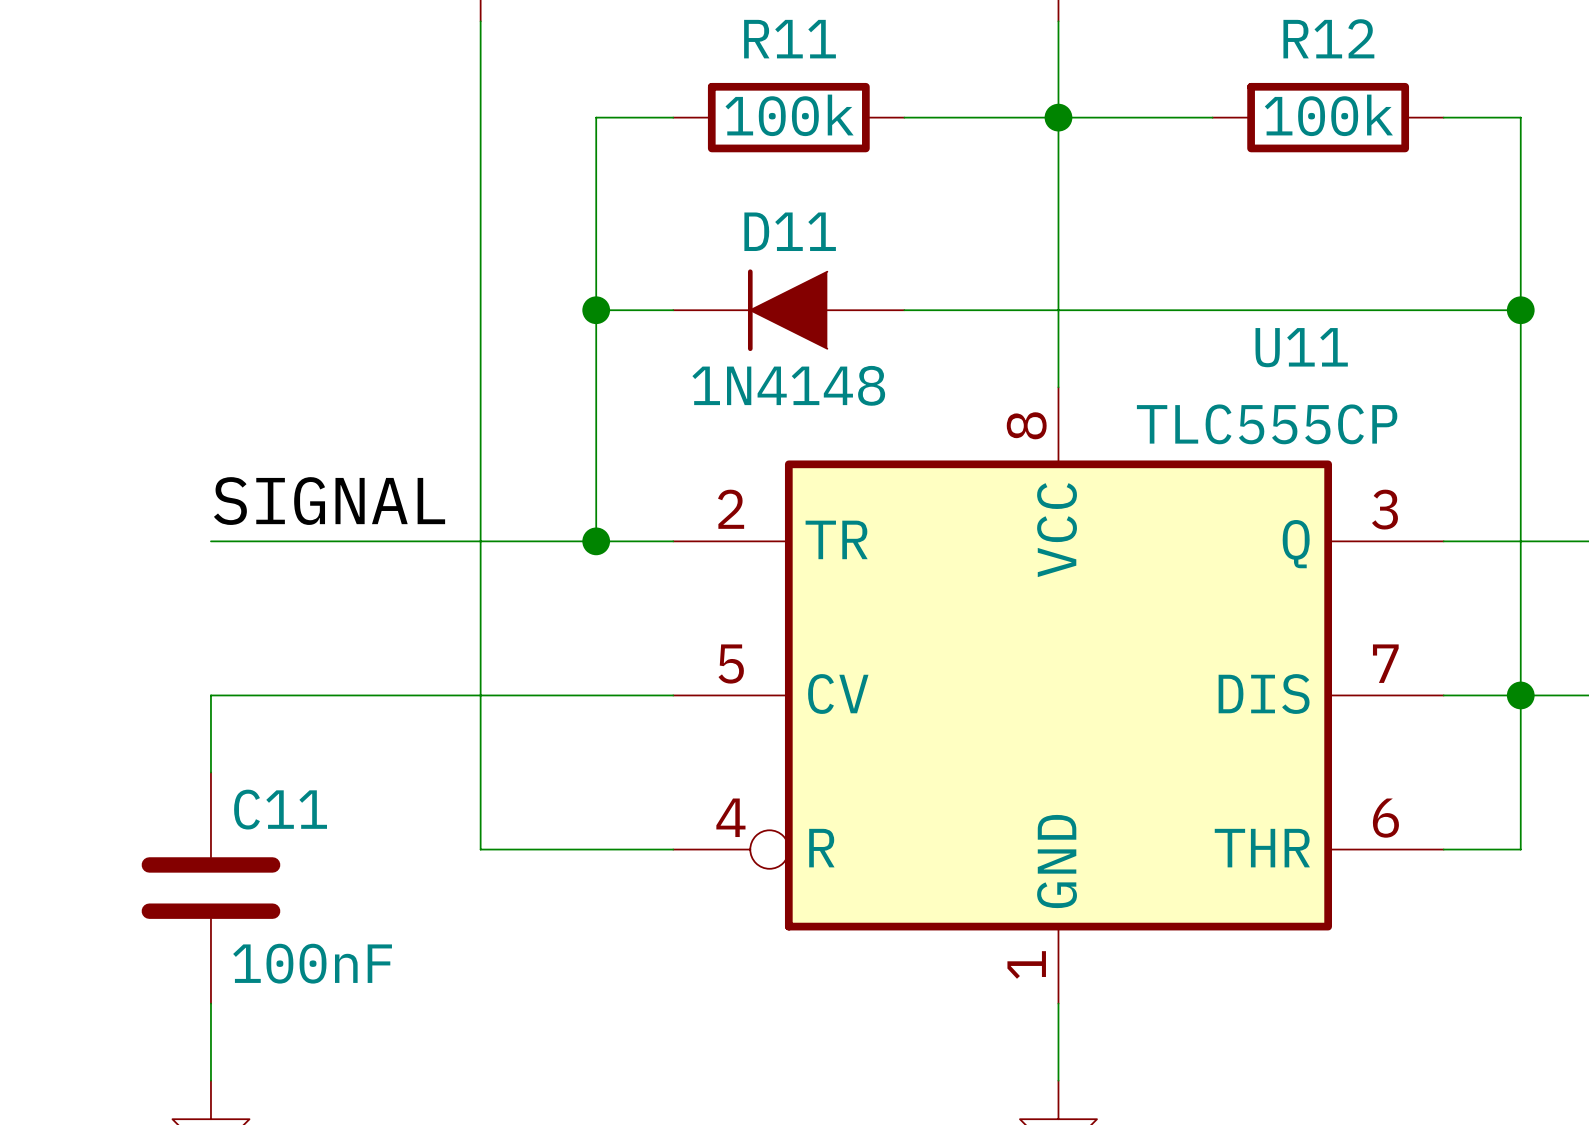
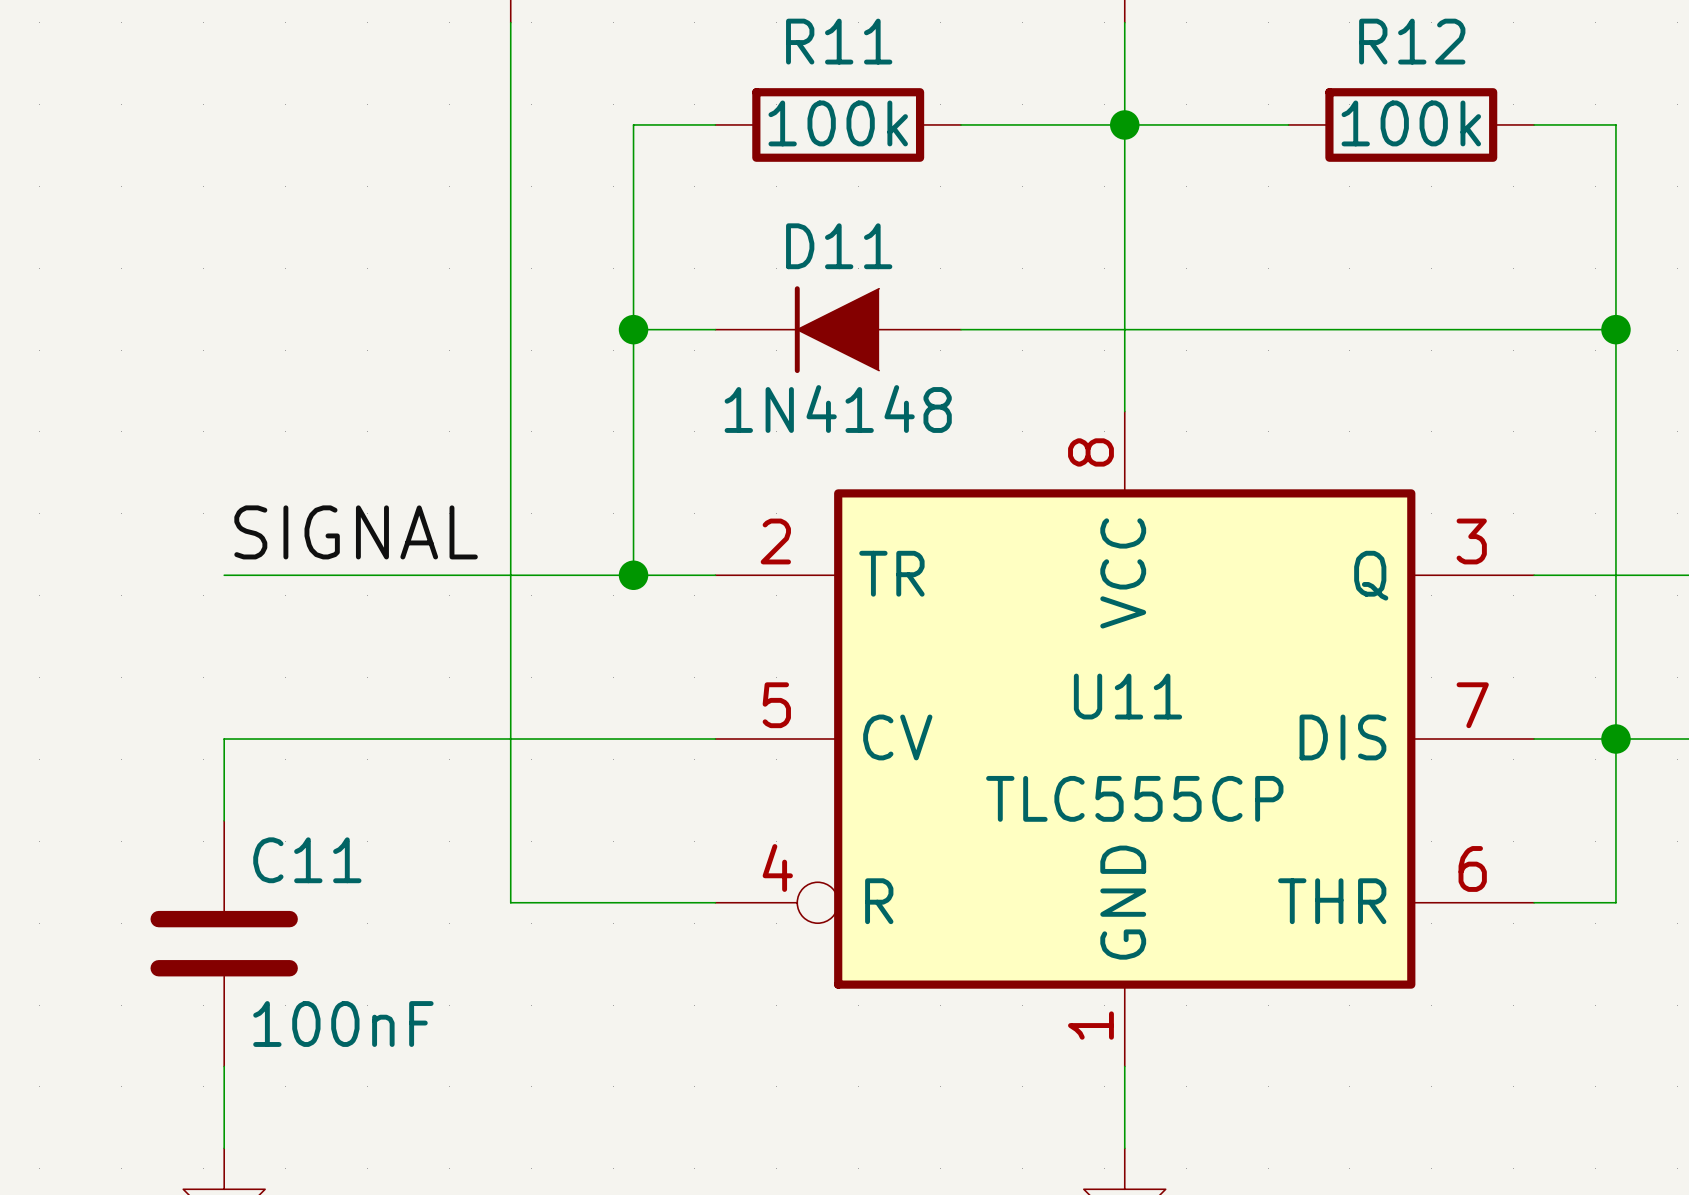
U11 name position: U11 (1301, 347) -> U11 (1127, 696)
U11 value position: TLC555CP (1267, 424) -> TLC555CP (1134, 798)

